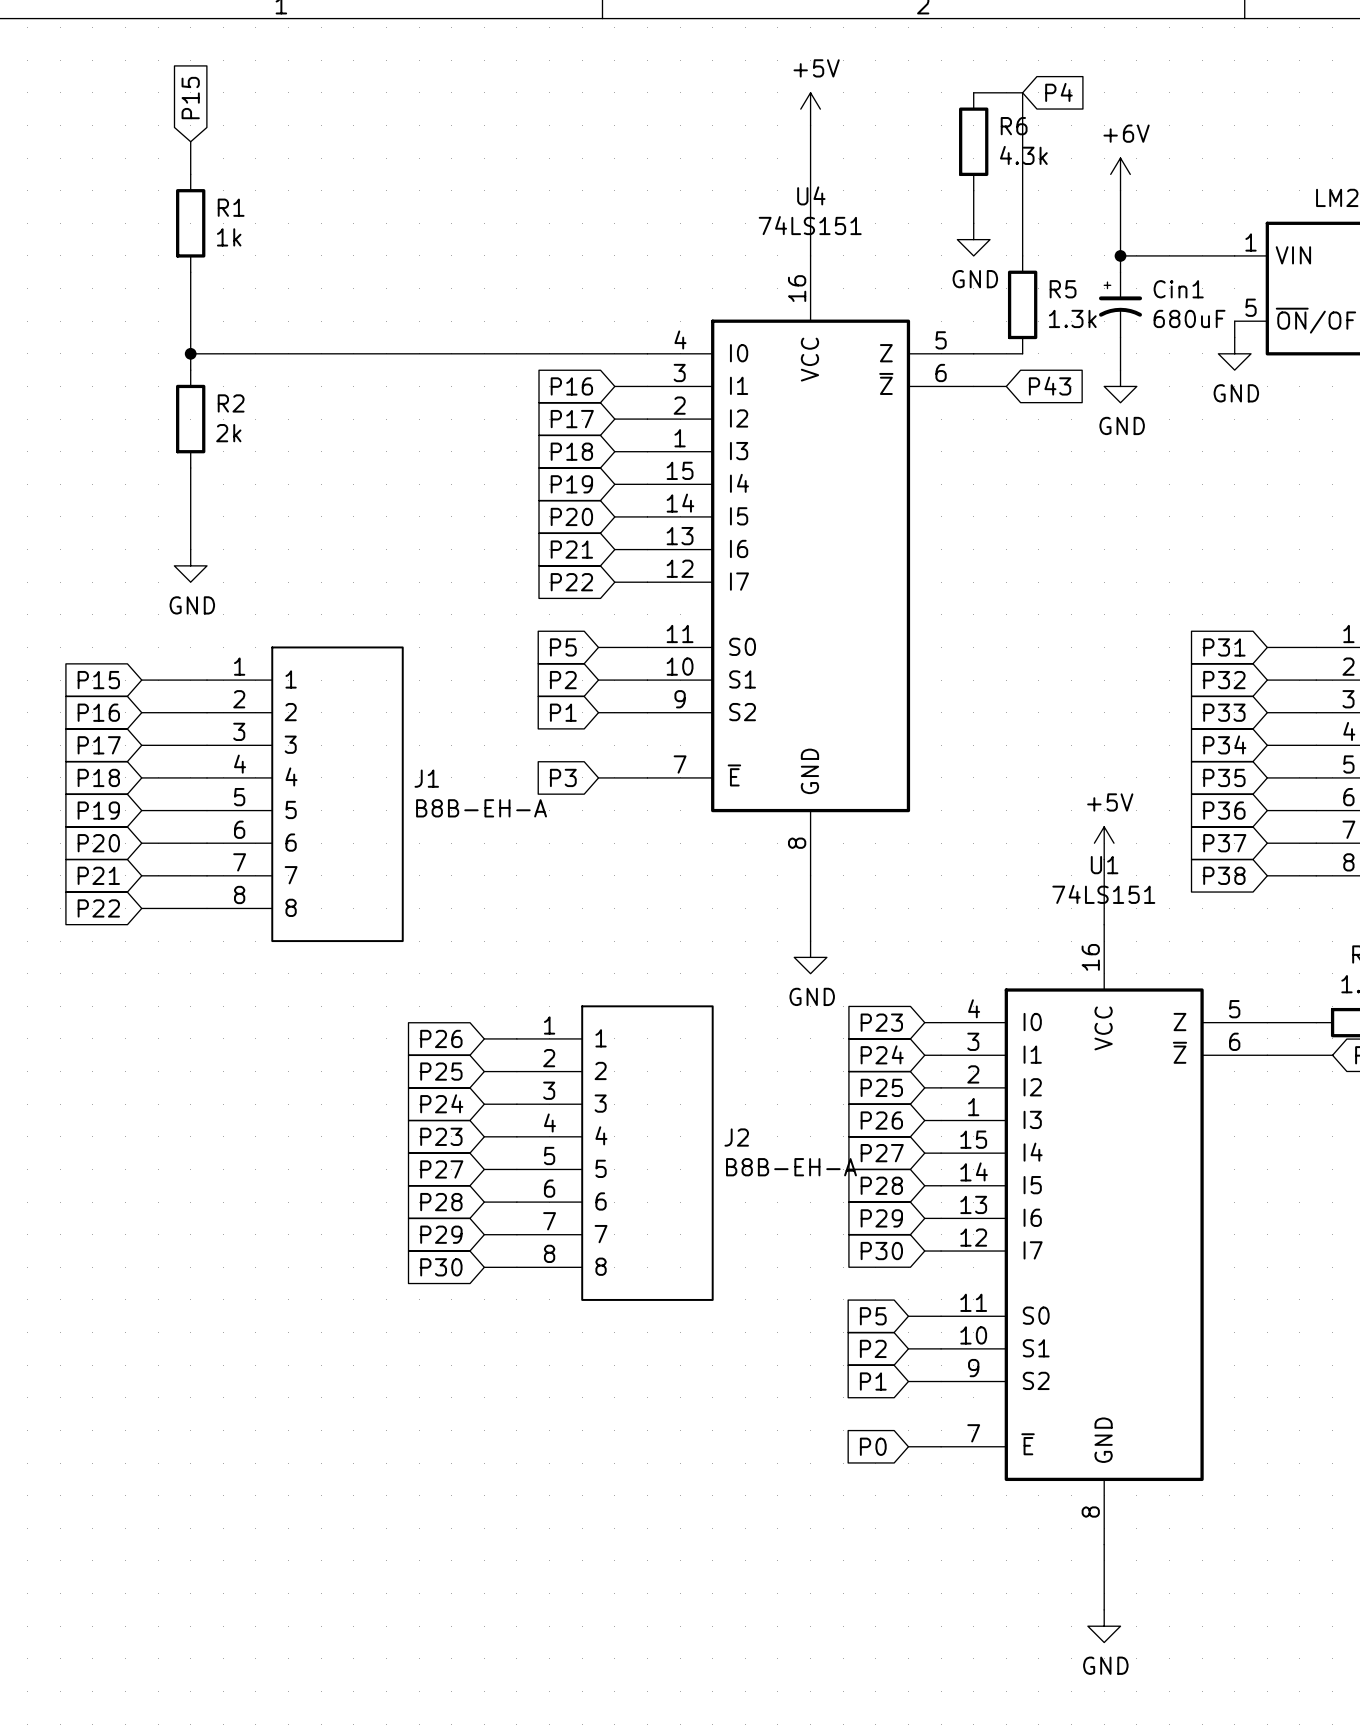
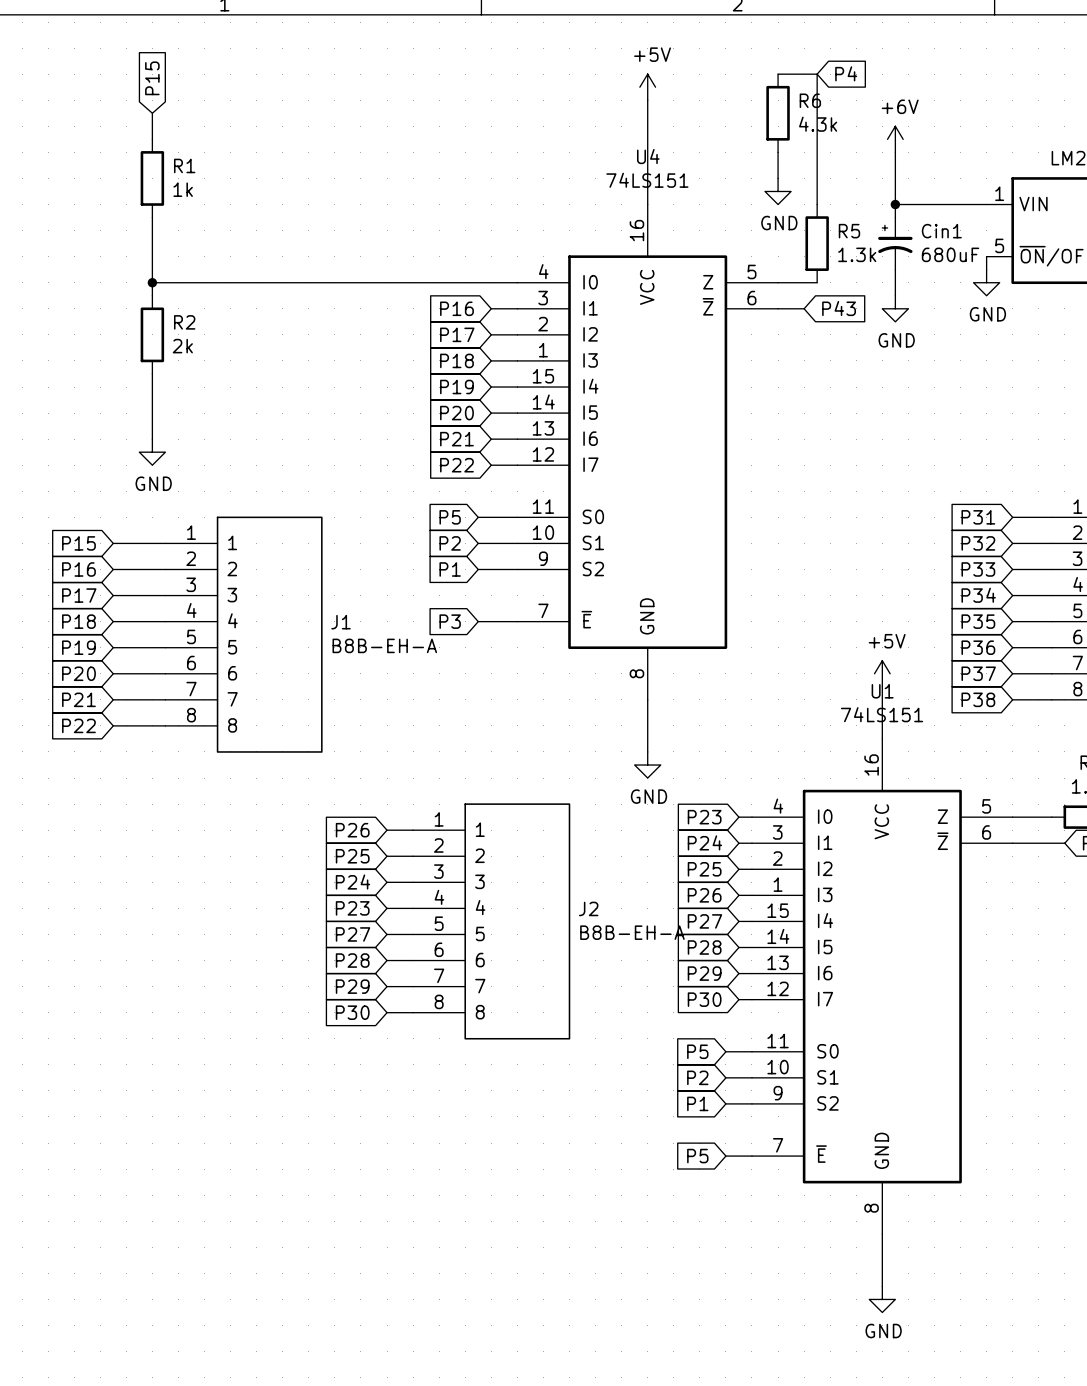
global label: P0 (873, 1446) -> P5 (697, 1156)

